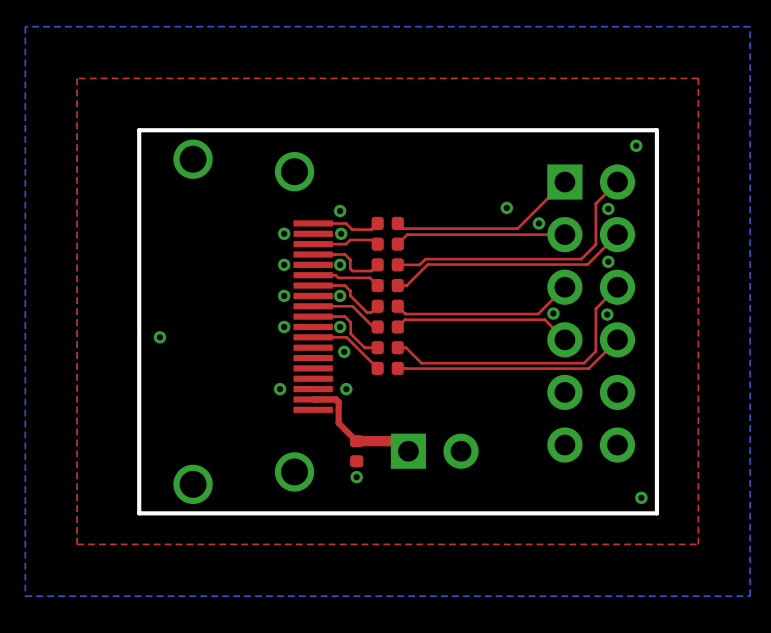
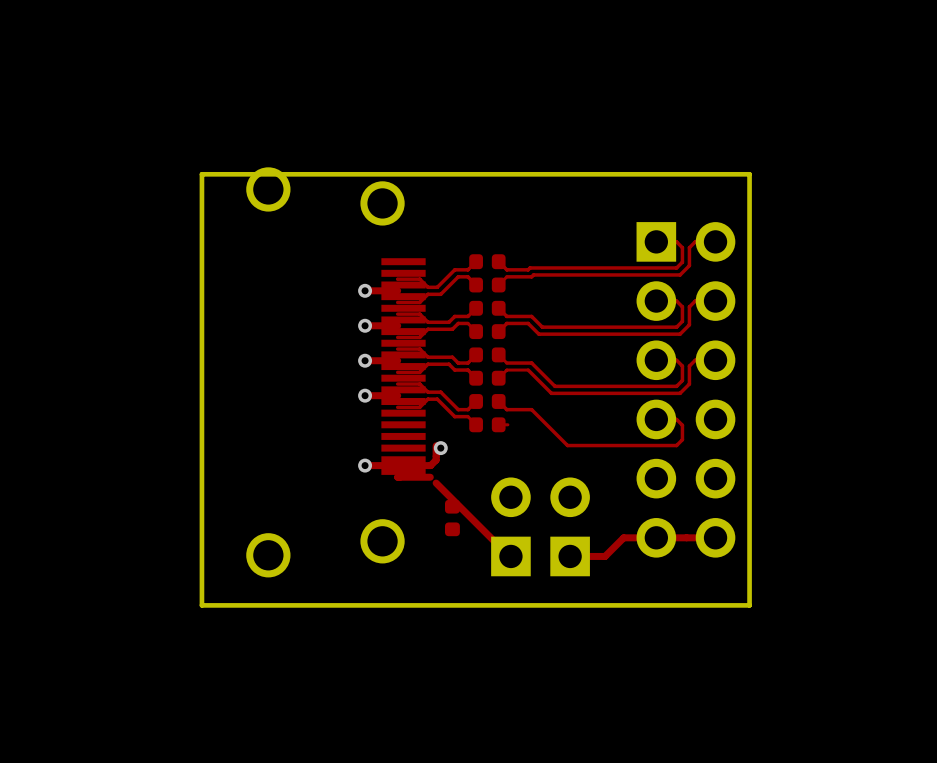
bottom zone outline: (750, 26) (25, 26) (25, 596) (750, 596) (750, 26) -> none
top zone outline: (698, 78) (77, 78) (77, 544) (698, 544) (698, 78) -> none
board edge: (656, 130) (656, 513) (139, 513) (139, 130) (656, 130) -> (749, 174) (749, 605) (201, 605) (201, 174) (749, 174)
via: (636, 145) -> none
top track: (564, 182) (517, 228) (402, 228) -> (656, 241) (676, 241) (682, 247) (682, 262) (676, 267) (530, 267) (528, 269) (506, 269) (504, 267)
top track: (617, 182) (595, 203) (595, 244) (581, 259) (425, 259) (419, 264) (397, 264) -> (656, 301) (676, 301) (682, 306) (682, 321) (676, 327) (542, 327) (531, 316) (506, 316) (498, 308)
via: (506, 207) -> none
via: (608, 208) -> none
via: (340, 211) -> none
top track: (313, 223) (346, 223) (352, 229) (371, 229) -> (397, 279) (419, 279) (427, 287) (437, 287) (454, 269) (469, 268)
via: (538, 223) -> none
via: (284, 233) -> none
via: (341, 233) -> none
top track: (564, 234) (407, 234) (405, 236) -> (715, 241) (695, 241) (689, 247) (689, 265) (680, 274) (533, 274) (531, 276) (506, 276)
top track: (617, 234) (587, 264) (427, 264) (406, 285) (397, 285) -> (715, 301) (695, 301) (689, 306) (689, 324) (680, 334) (538, 334) (528, 323) (506, 323) (498, 331)
top track: (373, 240) (350, 240) (345, 244) (313, 244) -> (471, 280) (467, 276) (458, 276) (440, 294) (427, 294) (419, 302) (397, 302)
via: none -> (365, 290)
top track: none -> (397, 290) (365, 290)
top track: (313, 254) (344, 254) (350, 259) (350, 268) (352, 271) (371, 271) -> (397, 314) (419, 314) (427, 322) (448, 322) (454, 316) (469, 315)
via: (608, 261) -> none
via: (284, 264) -> none
via: (340, 264) -> none
top track: (313, 275) (370, 278) -> (397, 337) (419, 337) (427, 329) (452, 329) (458, 323) (467, 323)
via: none -> (365, 325)
top track: none -> (397, 325) (365, 325)
top track: (313, 285) (345, 285) (350, 290) (350, 295) (367, 312) (371, 312) -> (397, 349) (419, 349) (427, 357) (452, 357) (458, 363) (469, 361)
top track: (564, 287) (538, 314) (405, 313) -> (656, 360) (676, 360) (682, 366) (682, 380) (676, 386) (554, 386) (531, 363) (506, 363)
top track: (617, 287) (595, 308) (595, 351) (583, 363) (421, 363) (405, 347) (397, 347) -> (656, 419) (676, 419) (682, 425) (682, 439) (676, 445) (567, 445) (531, 409) (506, 409) (498, 401)
via: (284, 295) -> none
via: (340, 295) -> none
top track: (313, 306) (352, 306) (373, 326) (377, 326) -> (397, 372) (419, 372) (427, 364) (448, 364) (454, 370) (467, 370) (476, 378)
via: none -> (365, 360)
top track: none -> (397, 360) (365, 360)
via: (553, 313) -> none
part position: (591, 313) -> (685, 389)
via: (607, 314) -> none
top track: (313, 316) (344, 316) (350, 322) (350, 333) (364, 347) (377, 347) -> (397, 384) (419, 384) (427, 392) (440, 392) (458, 409) (467, 409) (476, 401)
top track: (423, 319) (544, 319) (564, 339) -> (528, 370) (551, 393) (680, 393) (689, 384) (689, 366) (695, 360) (715, 360)
via: (284, 326) -> none
via: (340, 326) -> none
via: (159, 337) -> none
top track: (313, 337) (346, 337) (370, 361) -> (397, 407) (419, 407) (427, 399) (437, 399) (454, 416) (467, 416)
top track: (617, 339) (588, 368) (406, 368) -> none
via: none -> (365, 395)
top track: none -> (397, 395) (365, 395)
via: (344, 351) -> none
top track: none -> (436, 445) (436, 460) (430, 465) (365, 465)
via position: (280, 389) -> (365, 465)
top track: (313, 399) (336, 399) (338, 402) (338, 423) (356, 441) (398, 441) (408, 451) -> none
top track: none -> (430, 477) (397, 477)
top track: none -> (436, 483) (508, 556)
part: (434, 451) -> none
part: none -> (510, 526)
part: none -> (570, 526)
top track: none -> (715, 537) (623, 537) (605, 556) (570, 556)
via: (356, 477) -> none
via: (641, 497) -> none

